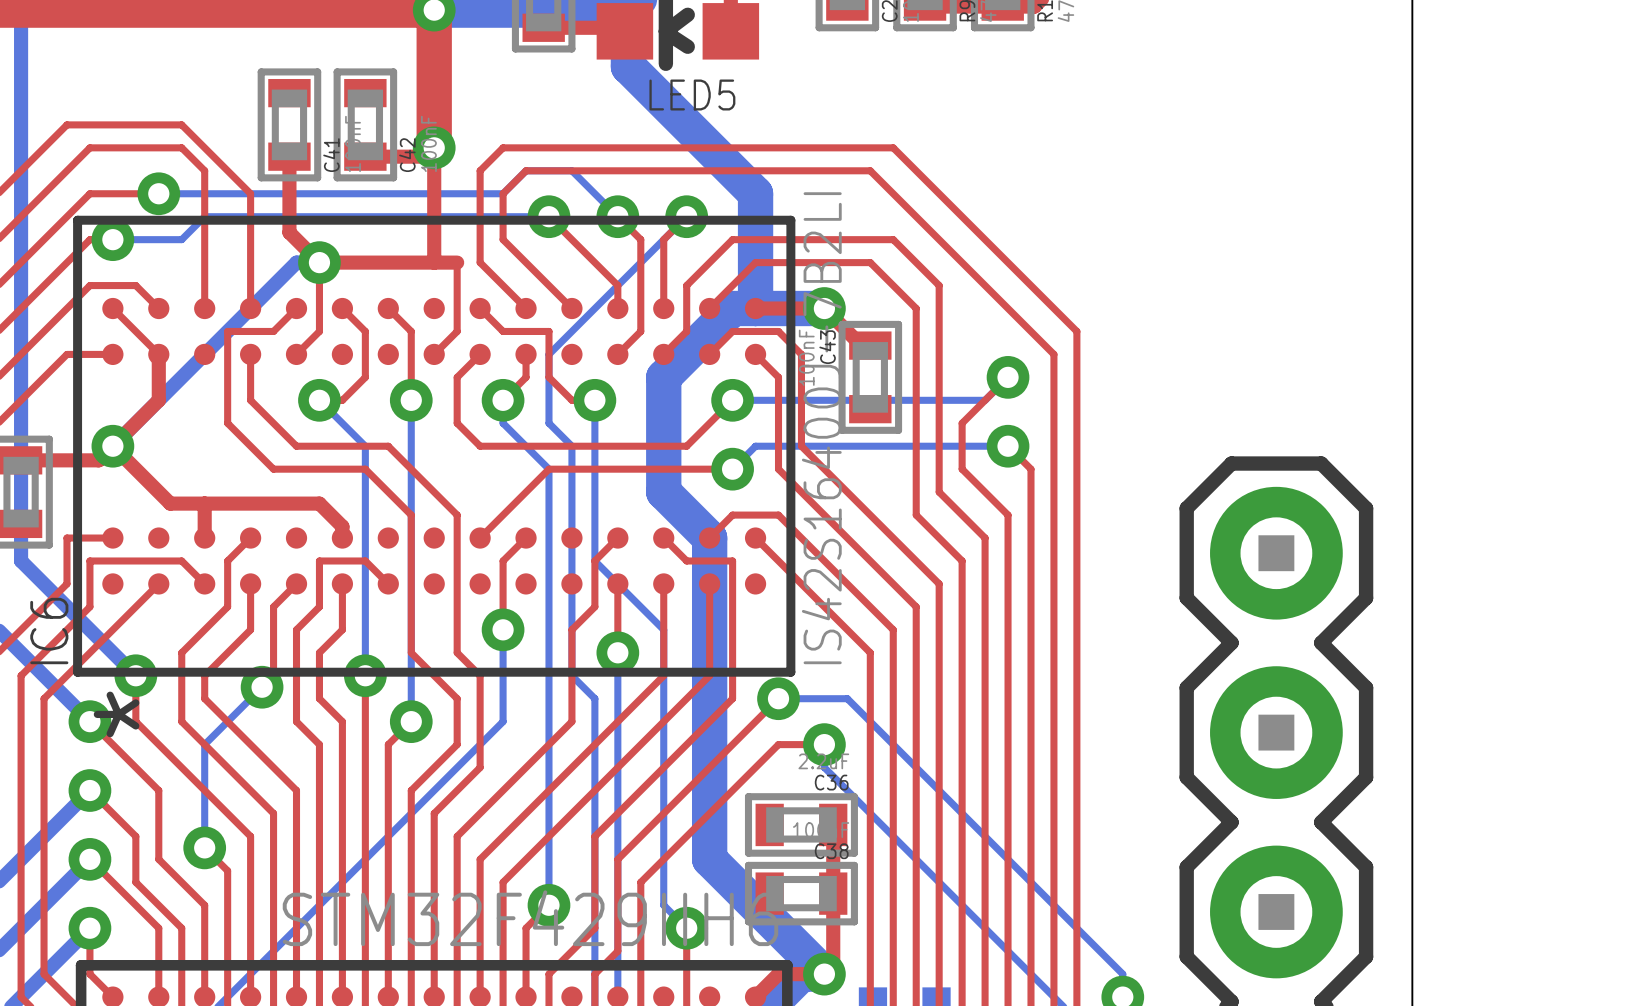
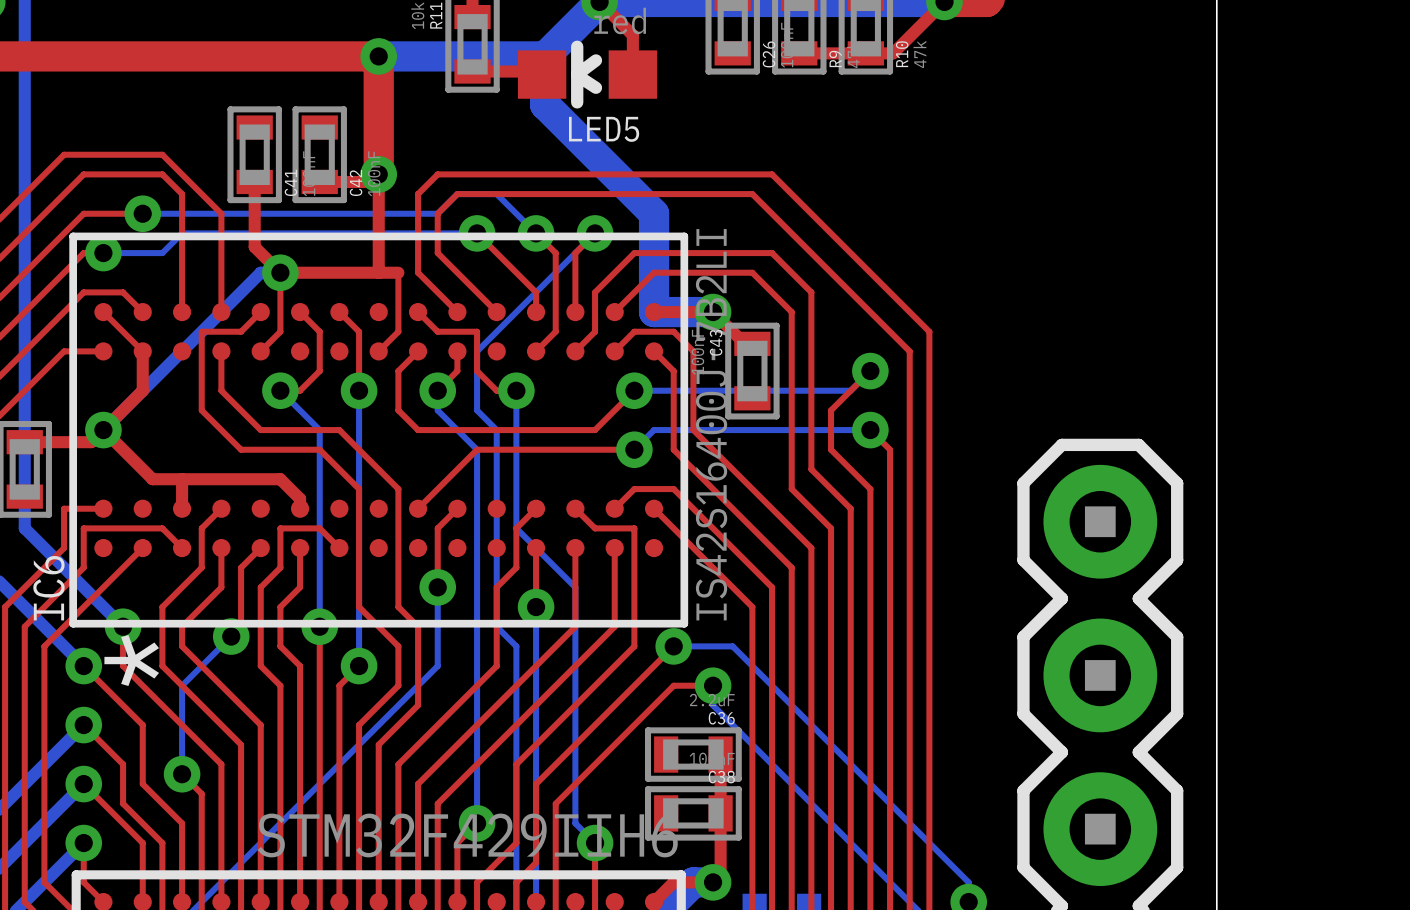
bottom track: (755, 308) (732, 308) (663, 377) (663, 492) (709, 538) (709, 859) (824, 974) -> none

